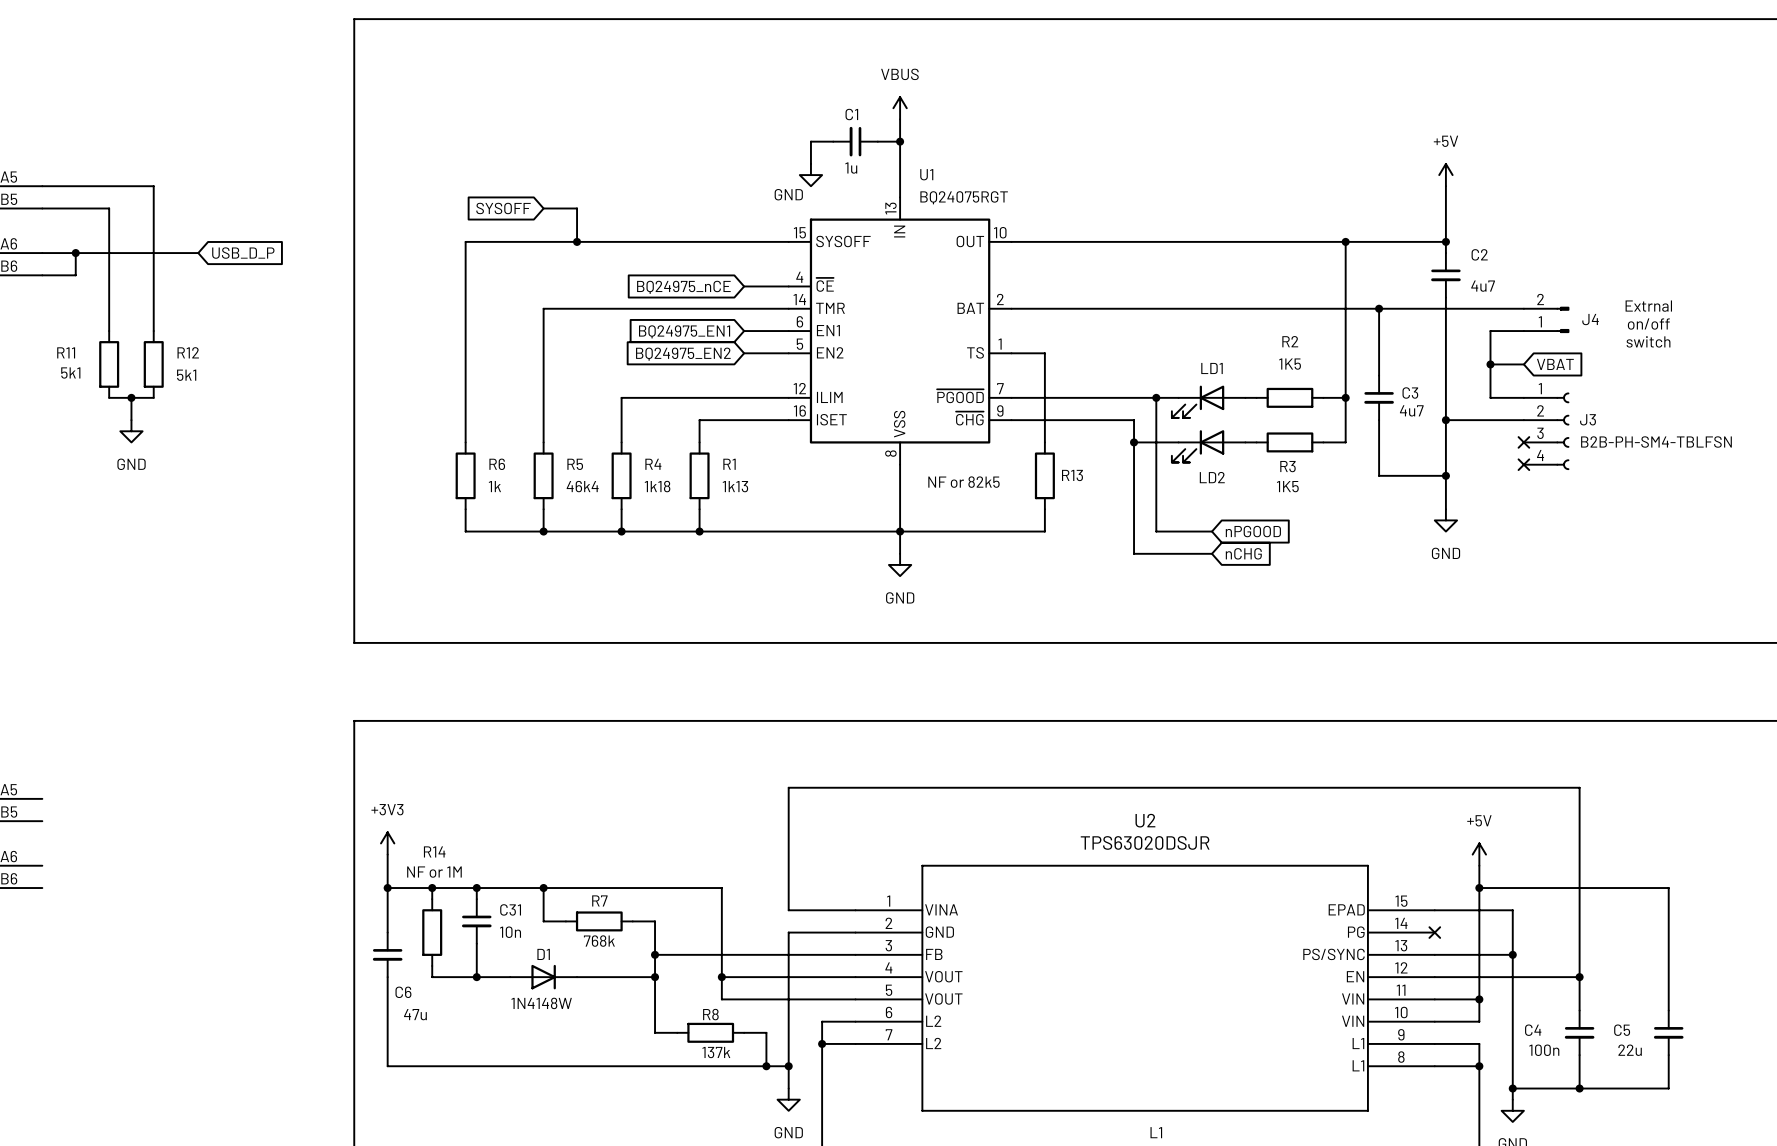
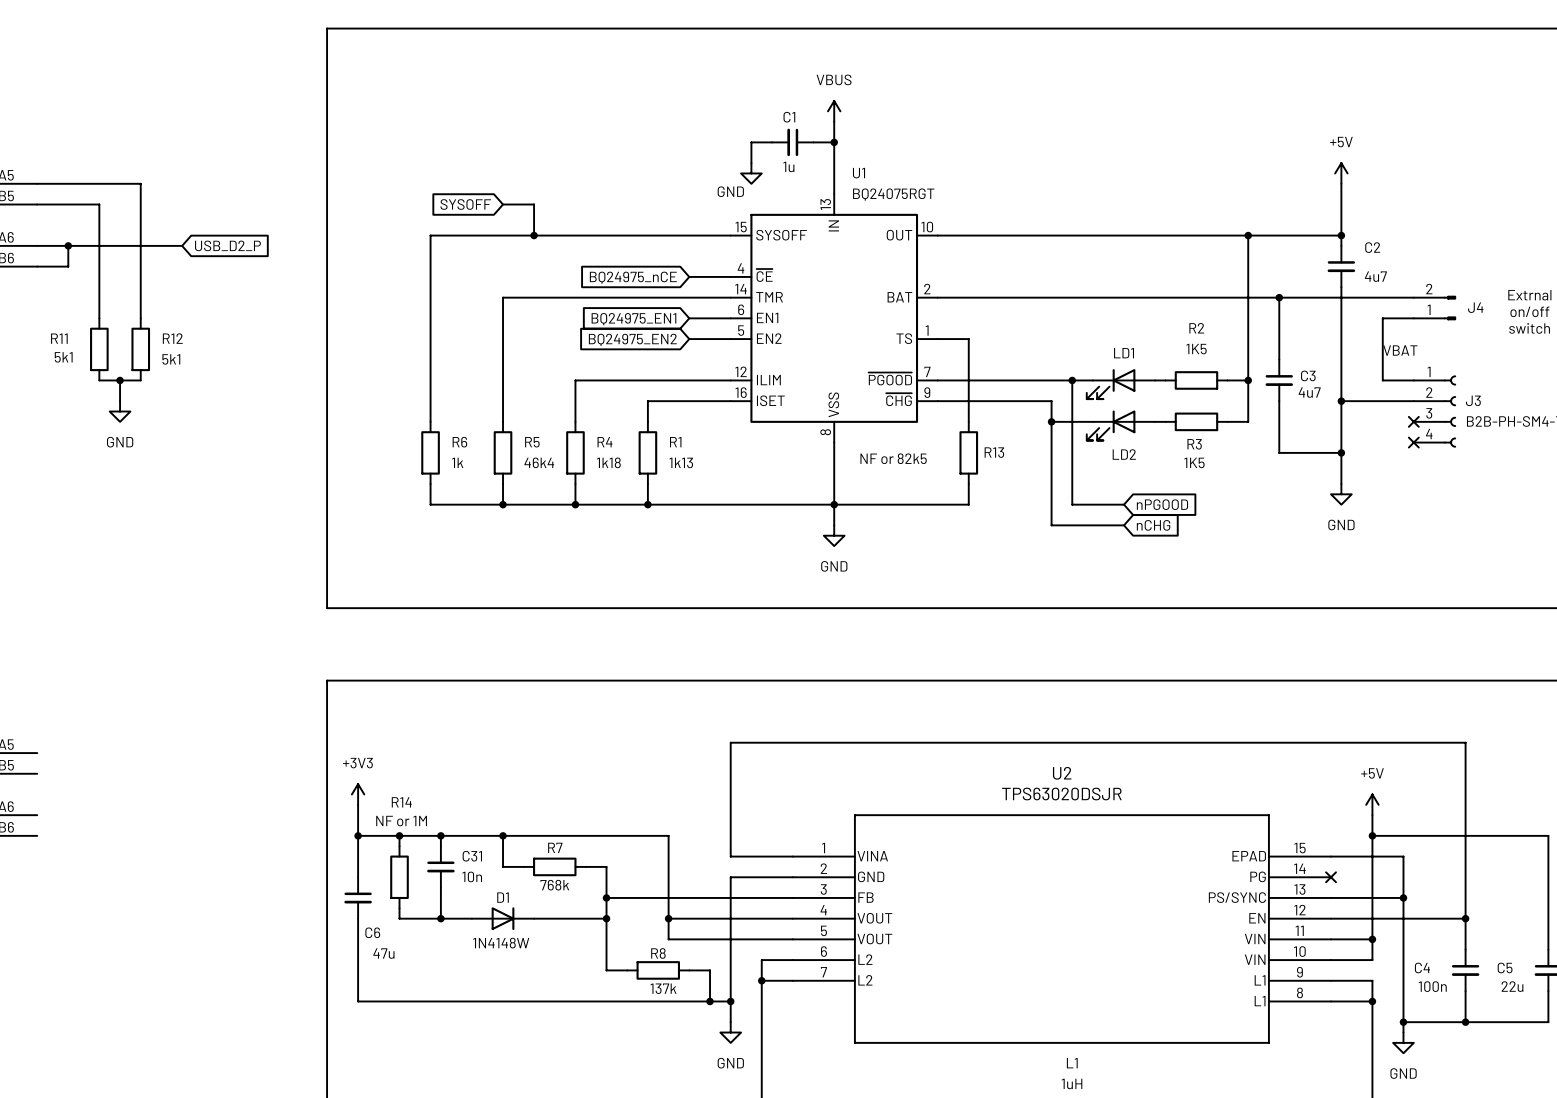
global label: USB_D_P (243, 253) -> USB_D2_P (227, 245)
wire: (1490, 364) (1523, 364) -> none
junction: (1490, 364) -> none
global label: VBAT (1555, 364) -> none
label: none -> VBAT (1400, 350)

